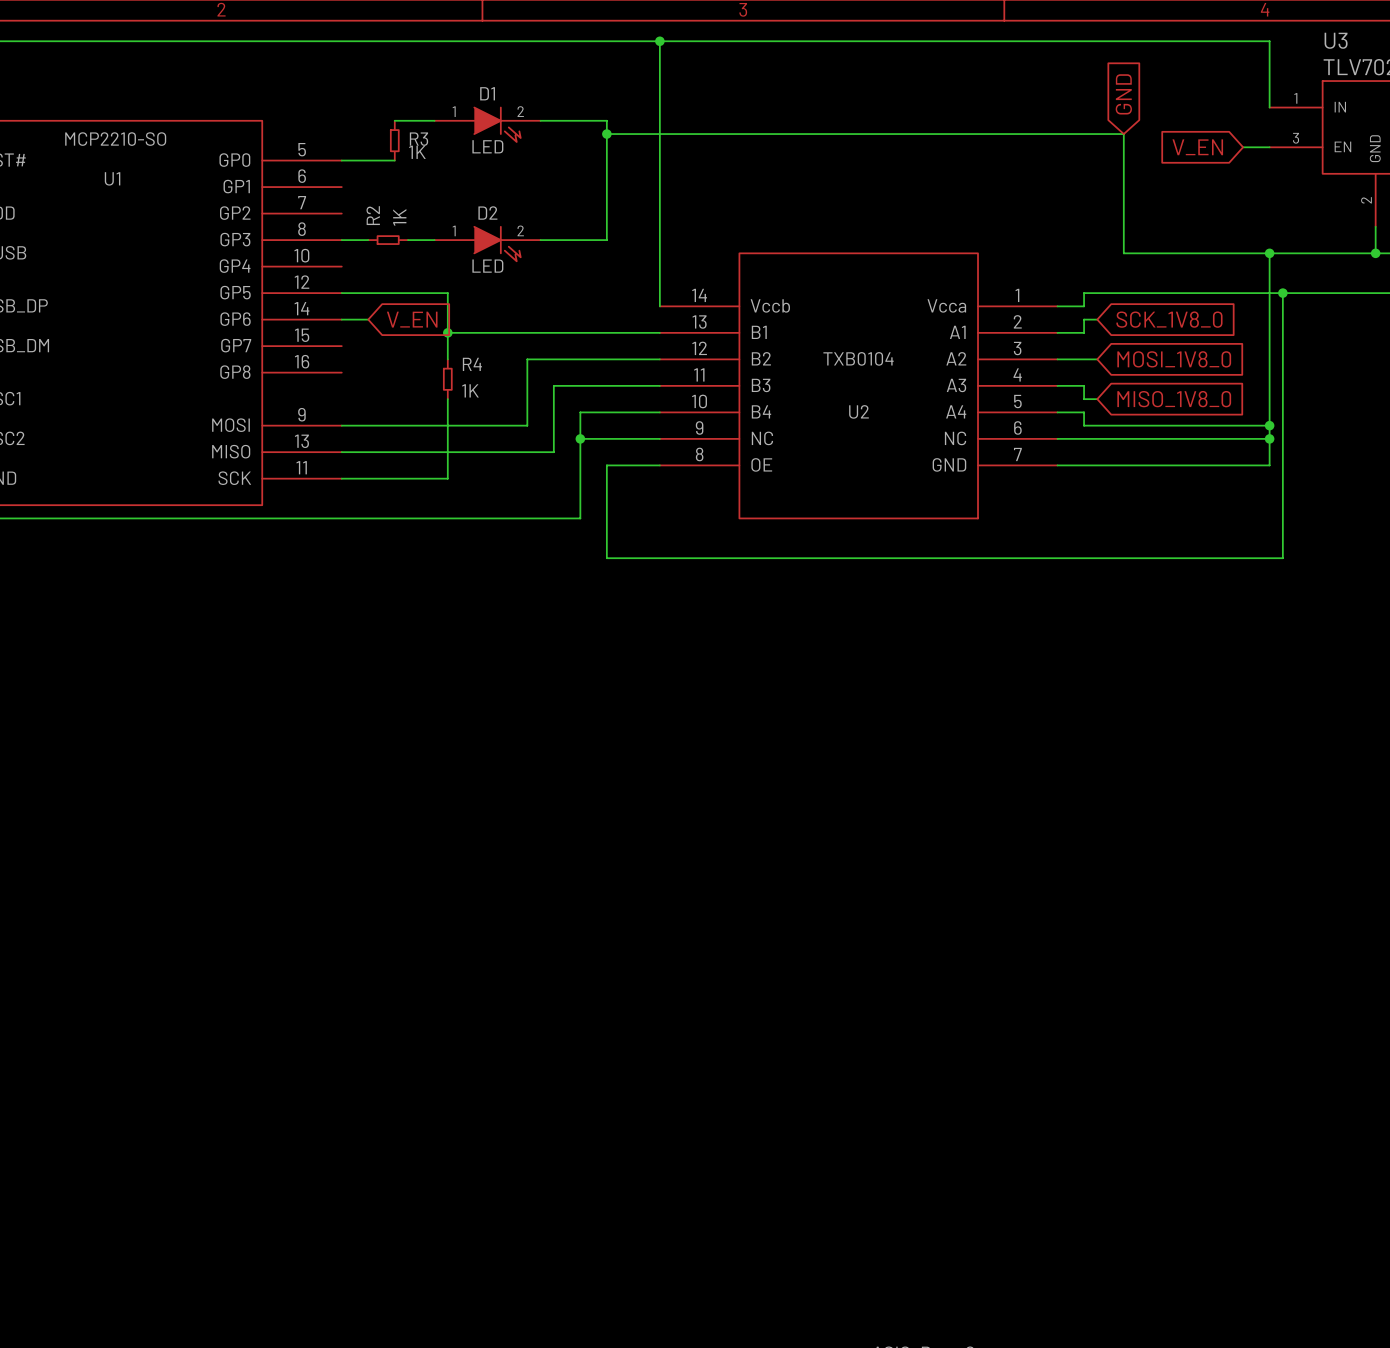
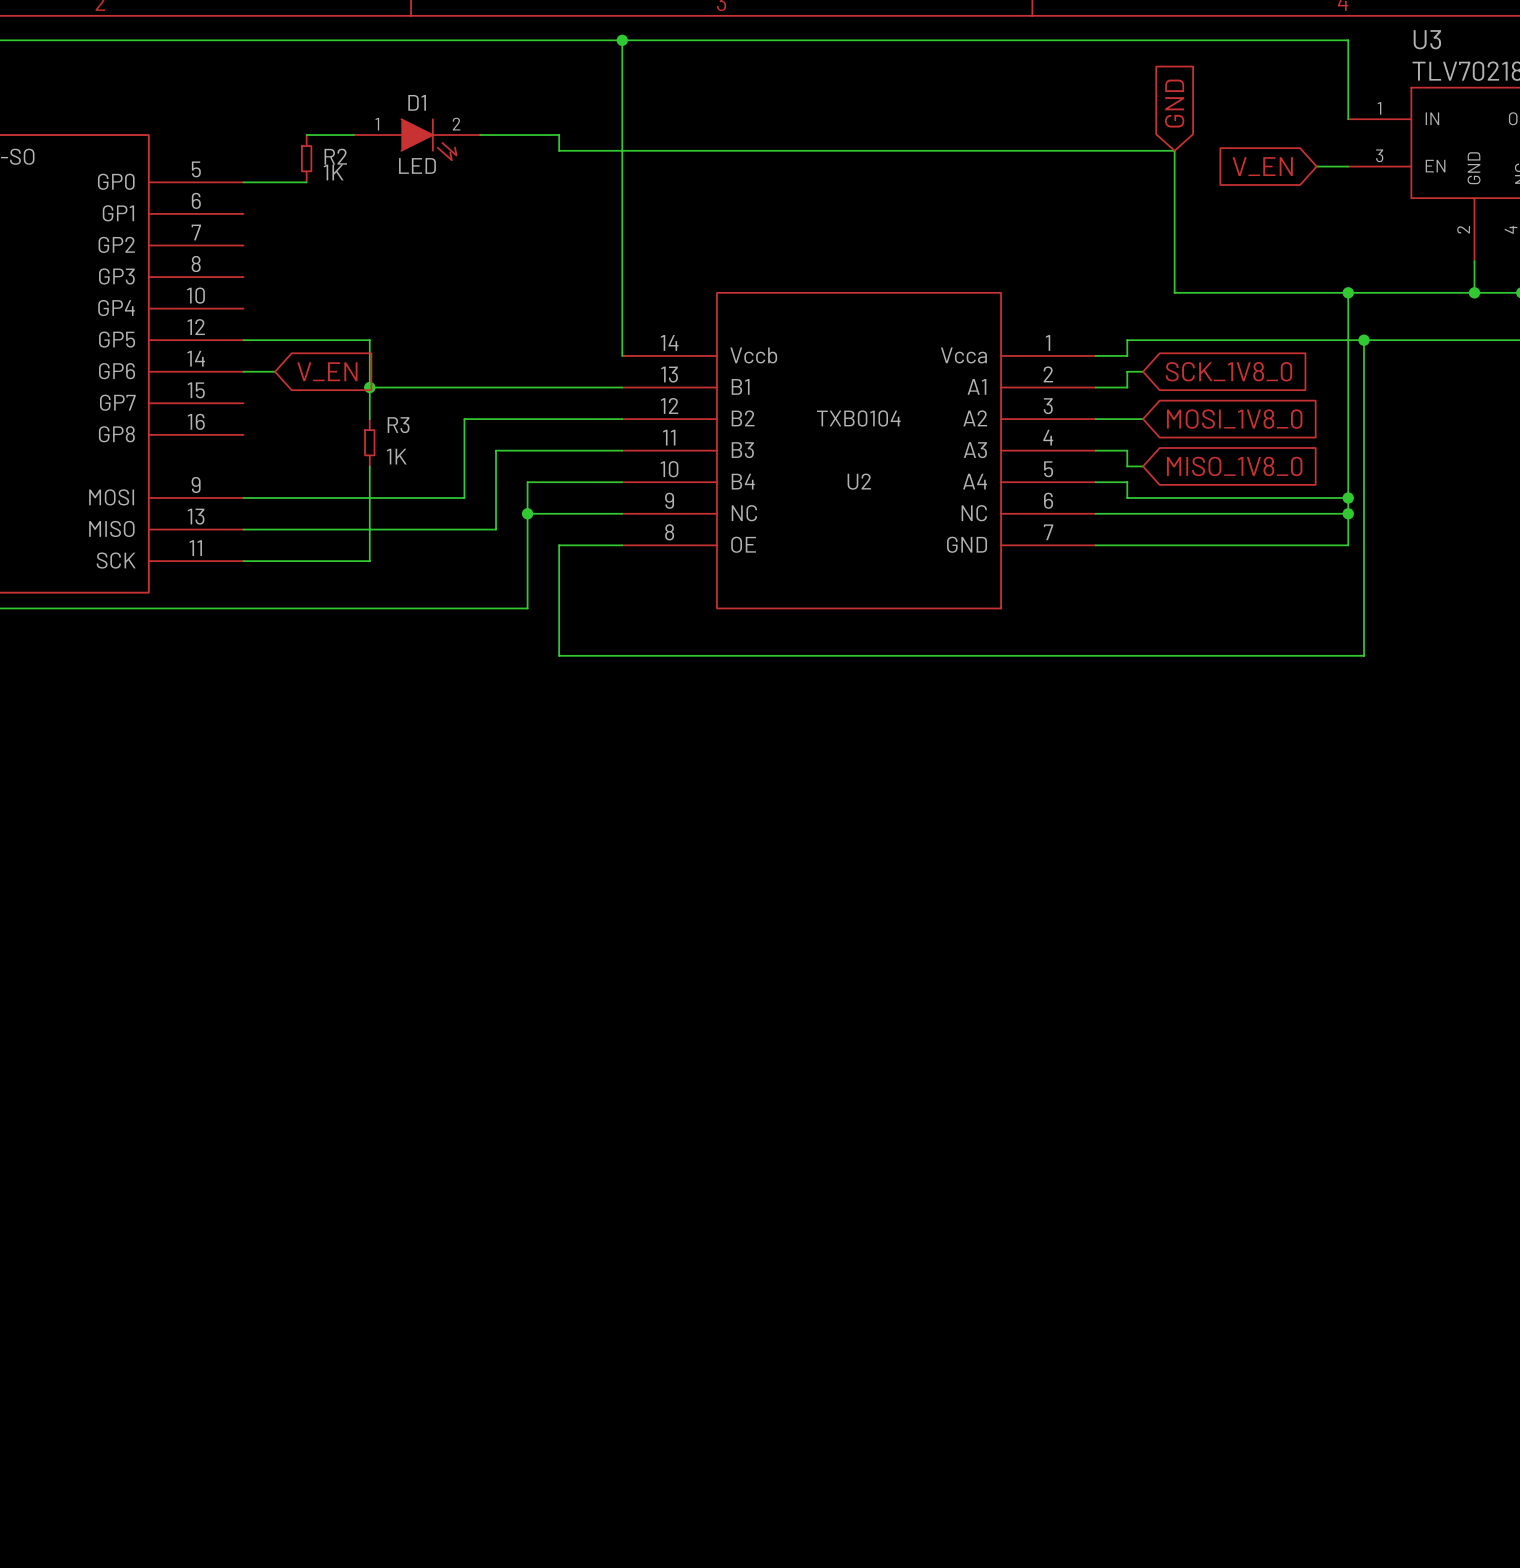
wire: (606, 134) (606, 240) (540, 240) -> none
junction: (606, 134) -> none
R3 name: R3 (418, 139) -> R2 (335, 156)
wire: (341, 240) (368, 240) -> none
R2: 1K (388, 240) -> none
wire: (408, 240) (434, 240) -> none
D2: LED (487, 244) -> none
R4 name: R4 (472, 364) -> R3 (398, 425)

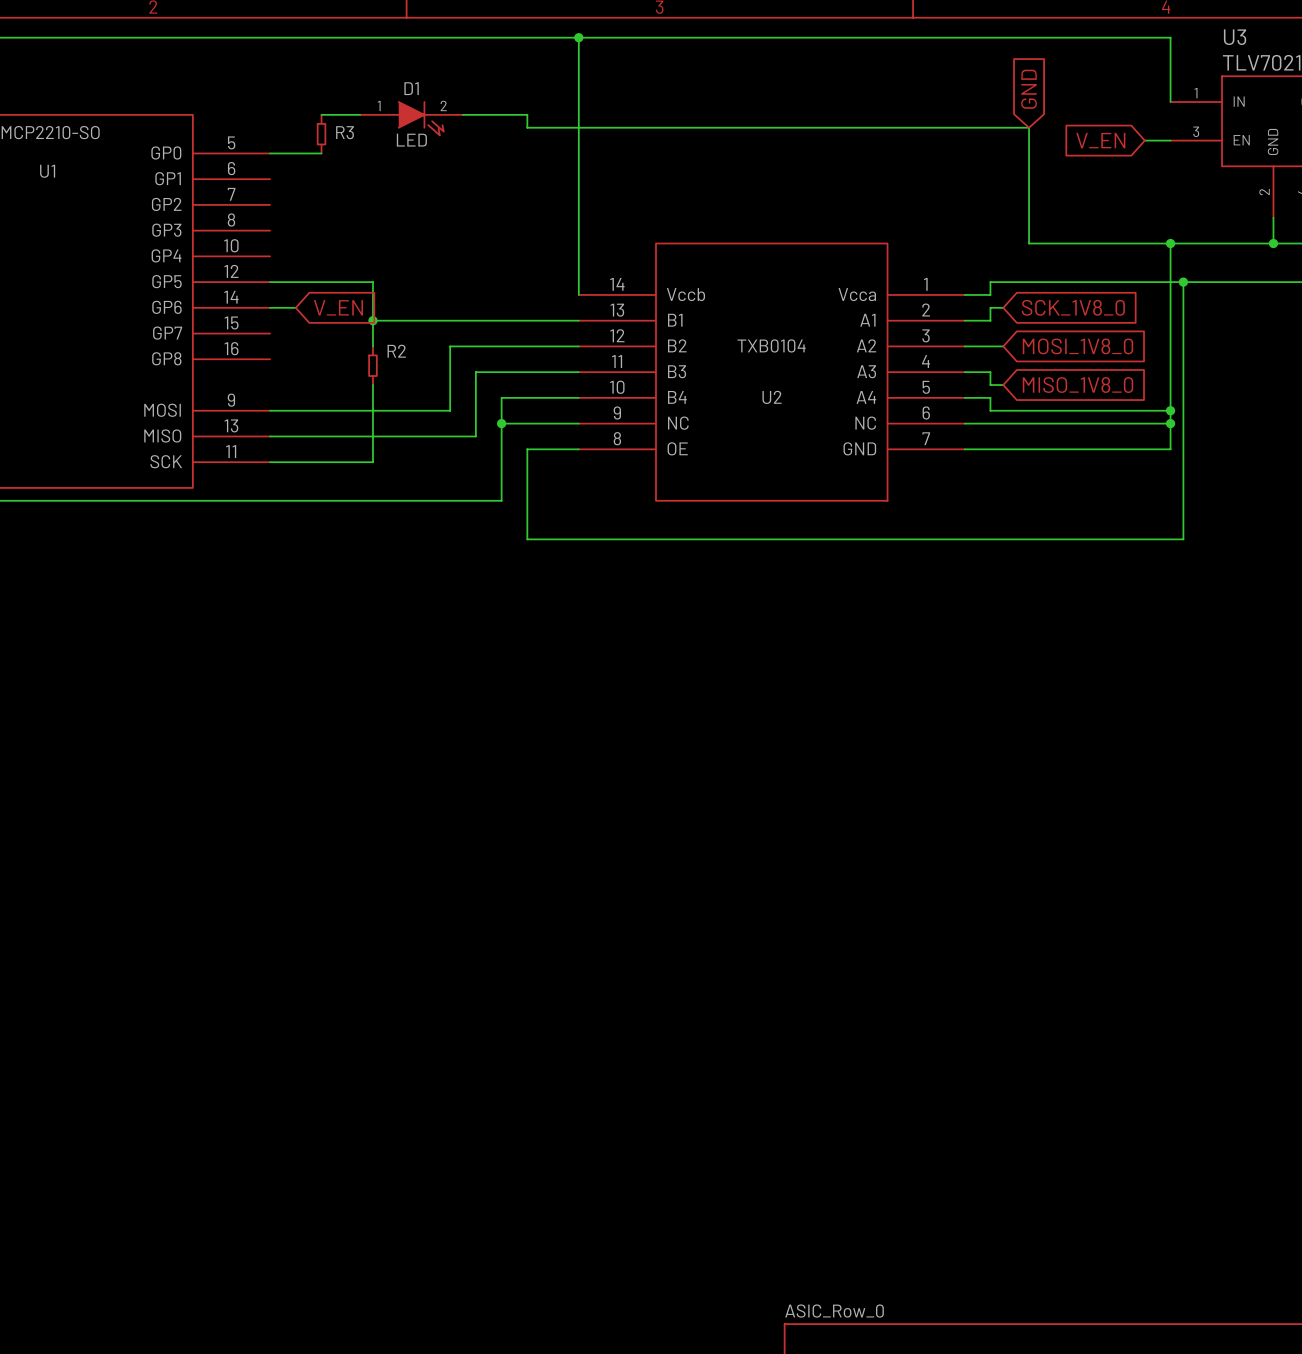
R2 name: R2 (335, 156) -> R3 (345, 132)
R2 value: 1K (333, 172) -> none
R3 name: R3 (398, 425) -> R2 (396, 351)
R3 value: 1K (396, 456) -> none

